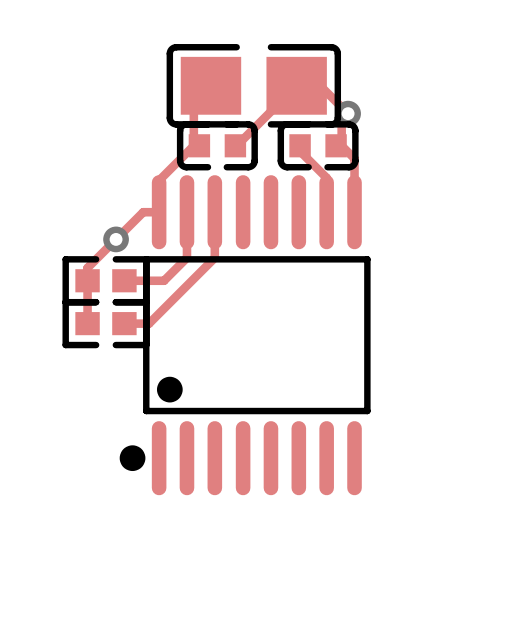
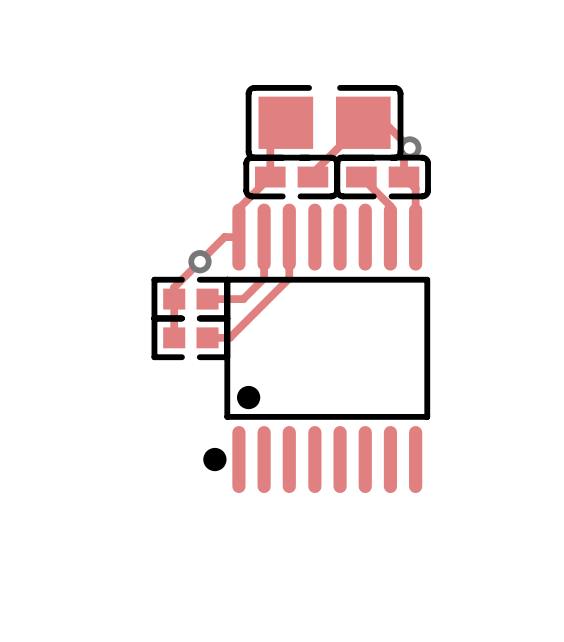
part footprint: [176, 121, 258, 171] -> [243, 154, 340, 200]
part footprint: [277, 121, 359, 171] -> [334, 154, 431, 200]

